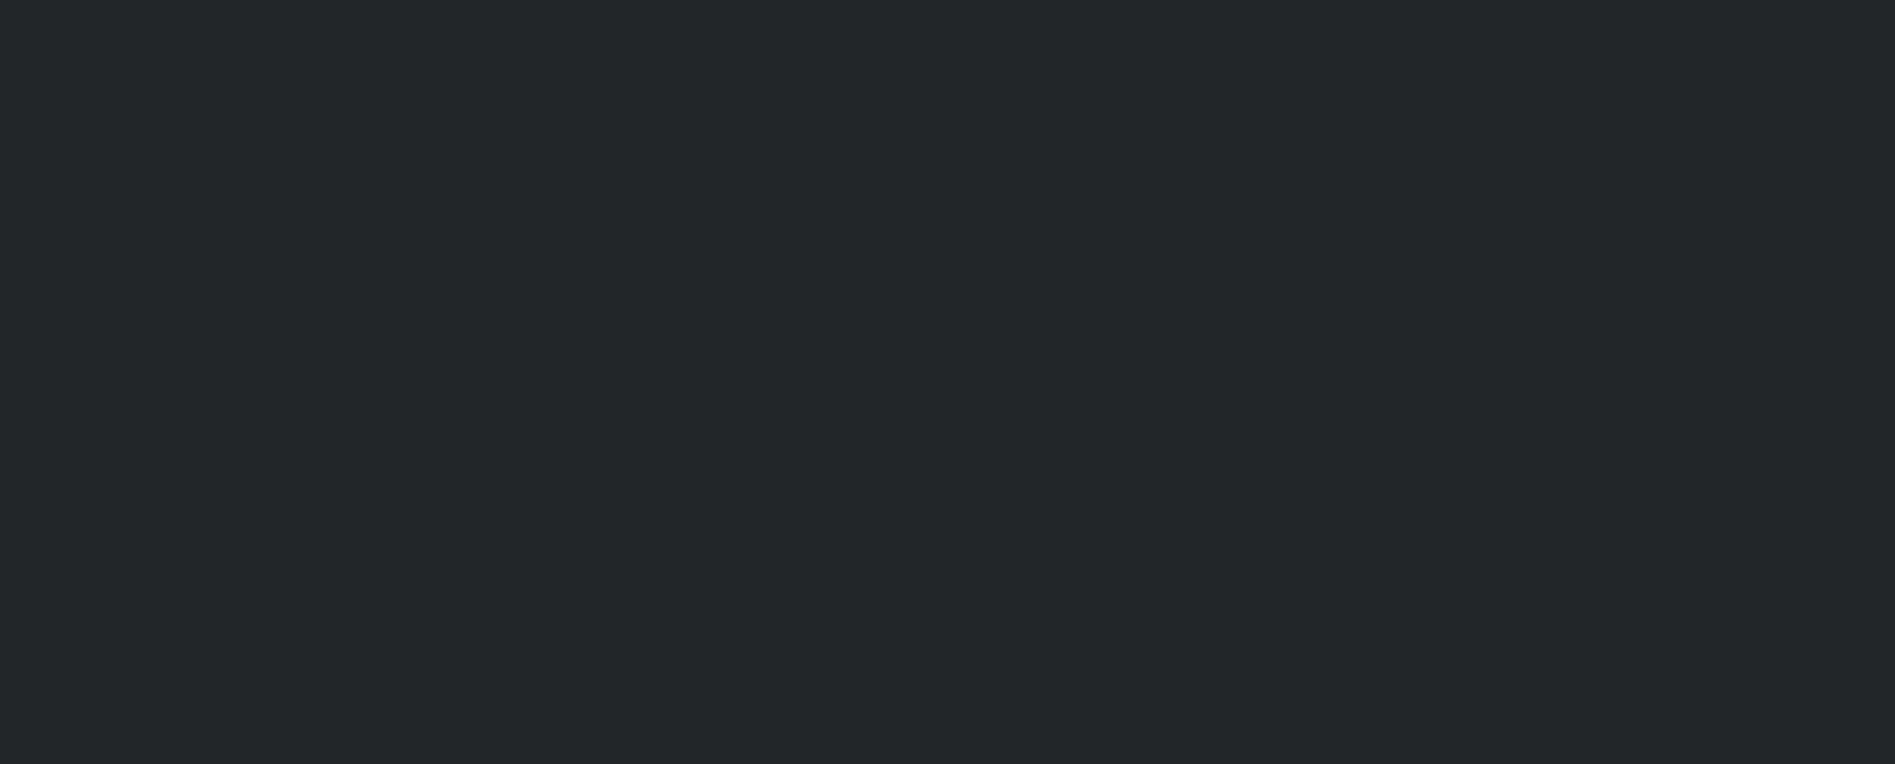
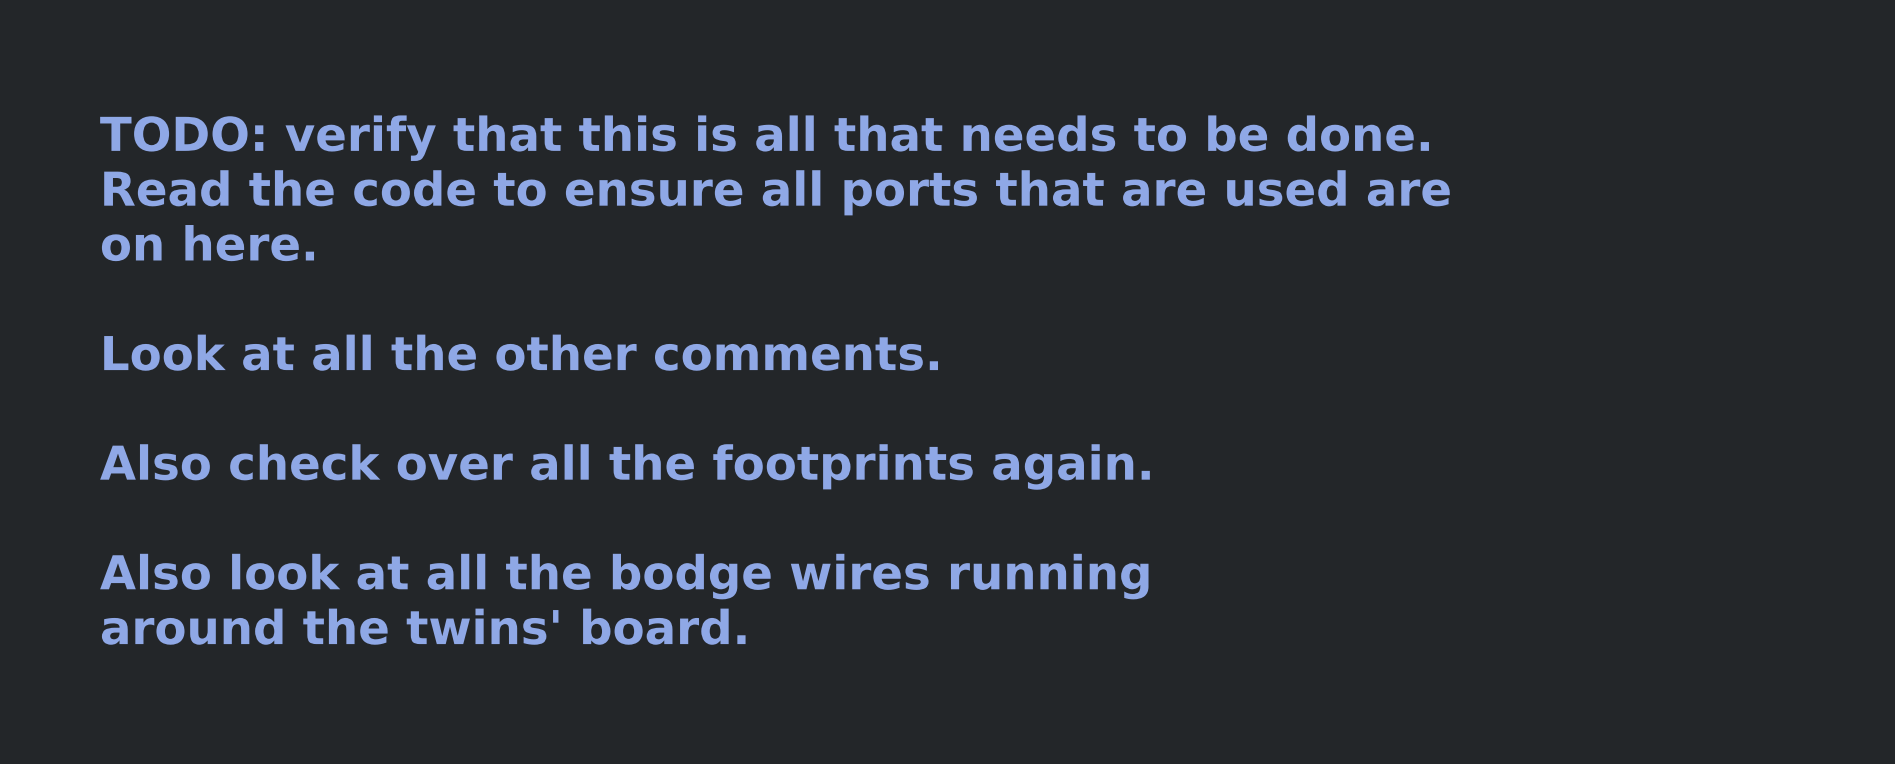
text: none -> TODO: verify that this is all that needs to be done. (764, 138)
text: none -> Read the code to ensure all ports that are used are (776, 192)
text: none -> on here. (207, 243)
text: none -> Look at all the other comments. (521, 352)
text: none -> Also check over all the footprints again. (624, 466)
text: none -> Also look at all the bodge wires running (624, 576)
text: none -> around the twins' board. (423, 626)

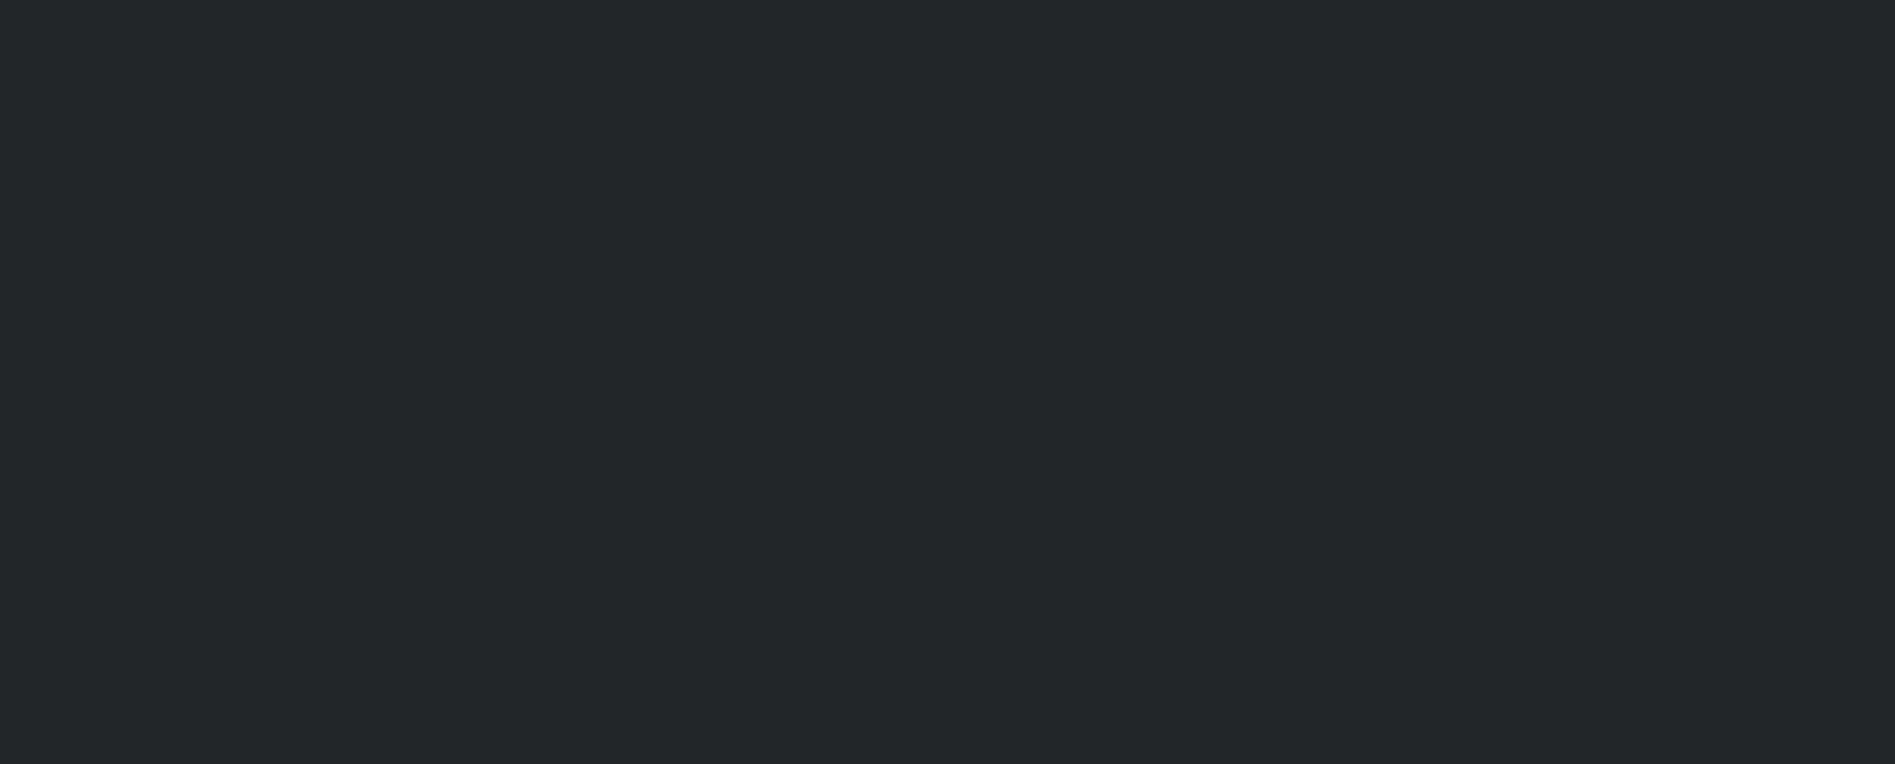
text: TODO: verify that this is all that needs to be done. (764, 138) -> none
text: Read the code to ensure all ports that are used are (776, 192) -> none
text: on here. (207, 243) -> none
text: Look at all the other comments. (521, 352) -> none
text: Also check over all the footprints again. (624, 466) -> none
text: Also look at all the bodge wires running (624, 576) -> none
text: around the twins' board. (423, 626) -> none

